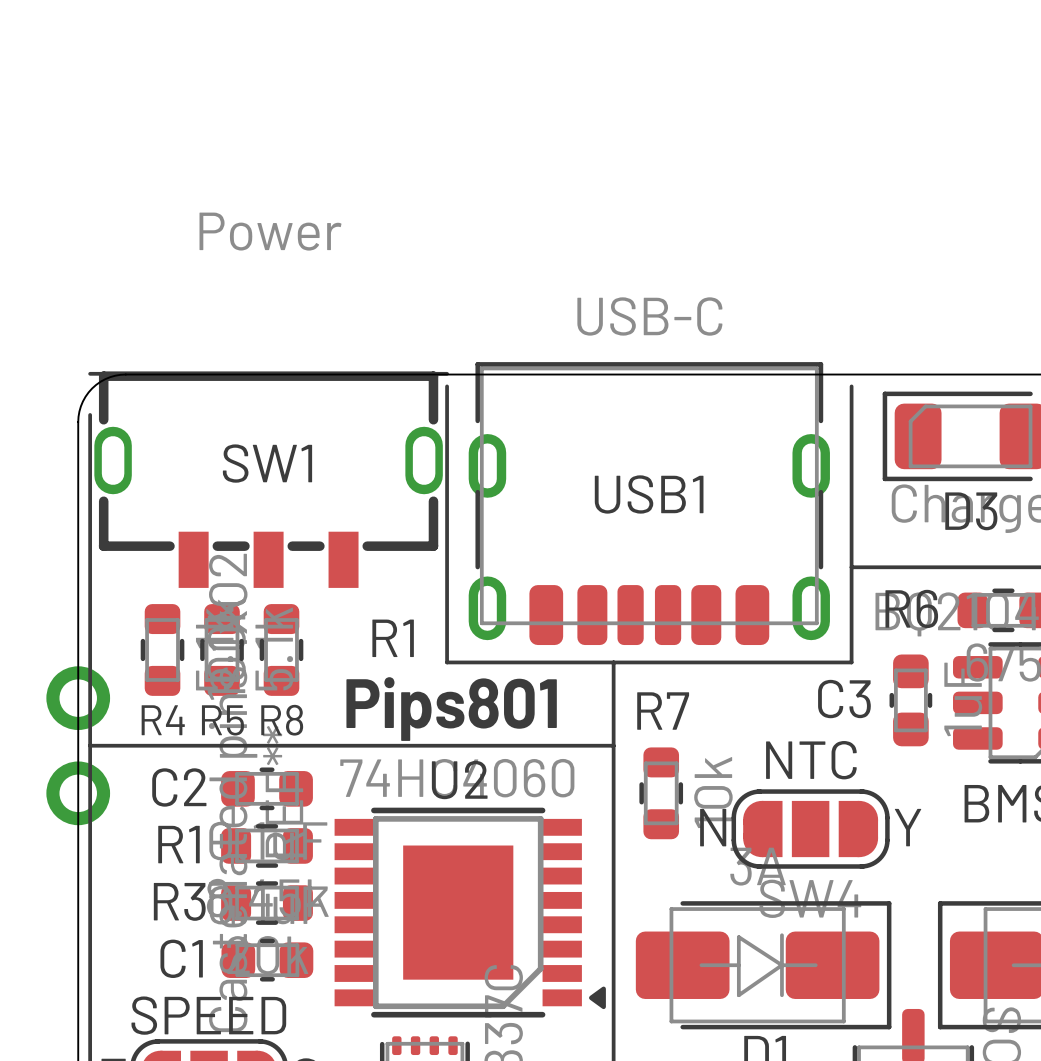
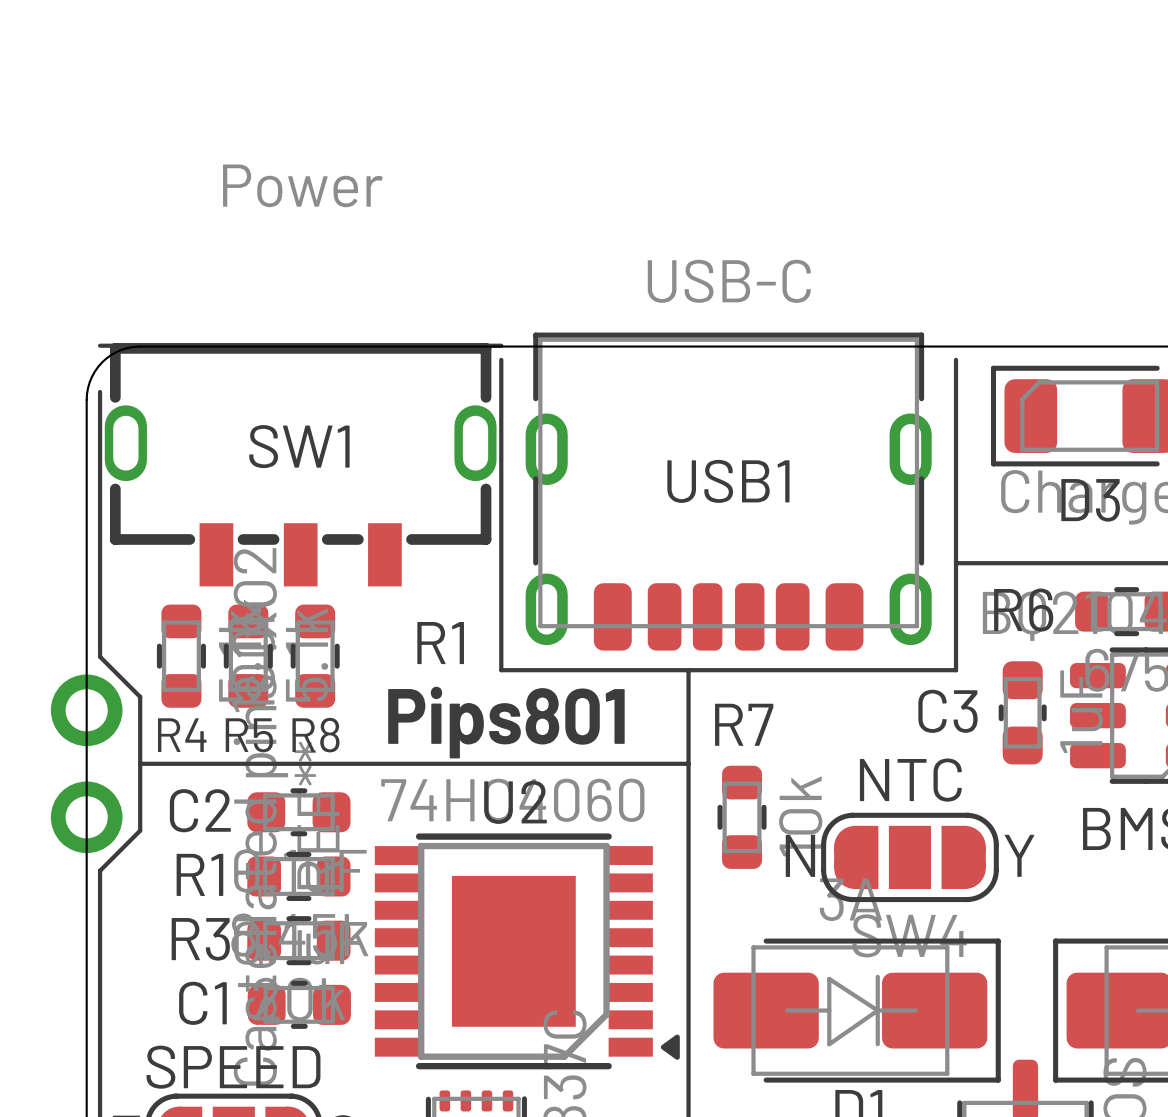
line: (90, 650) (90, 840) -> (100, 656) (140, 696) (140, 830) (100, 870)
line: (90, 745) (125, 745) -> none

